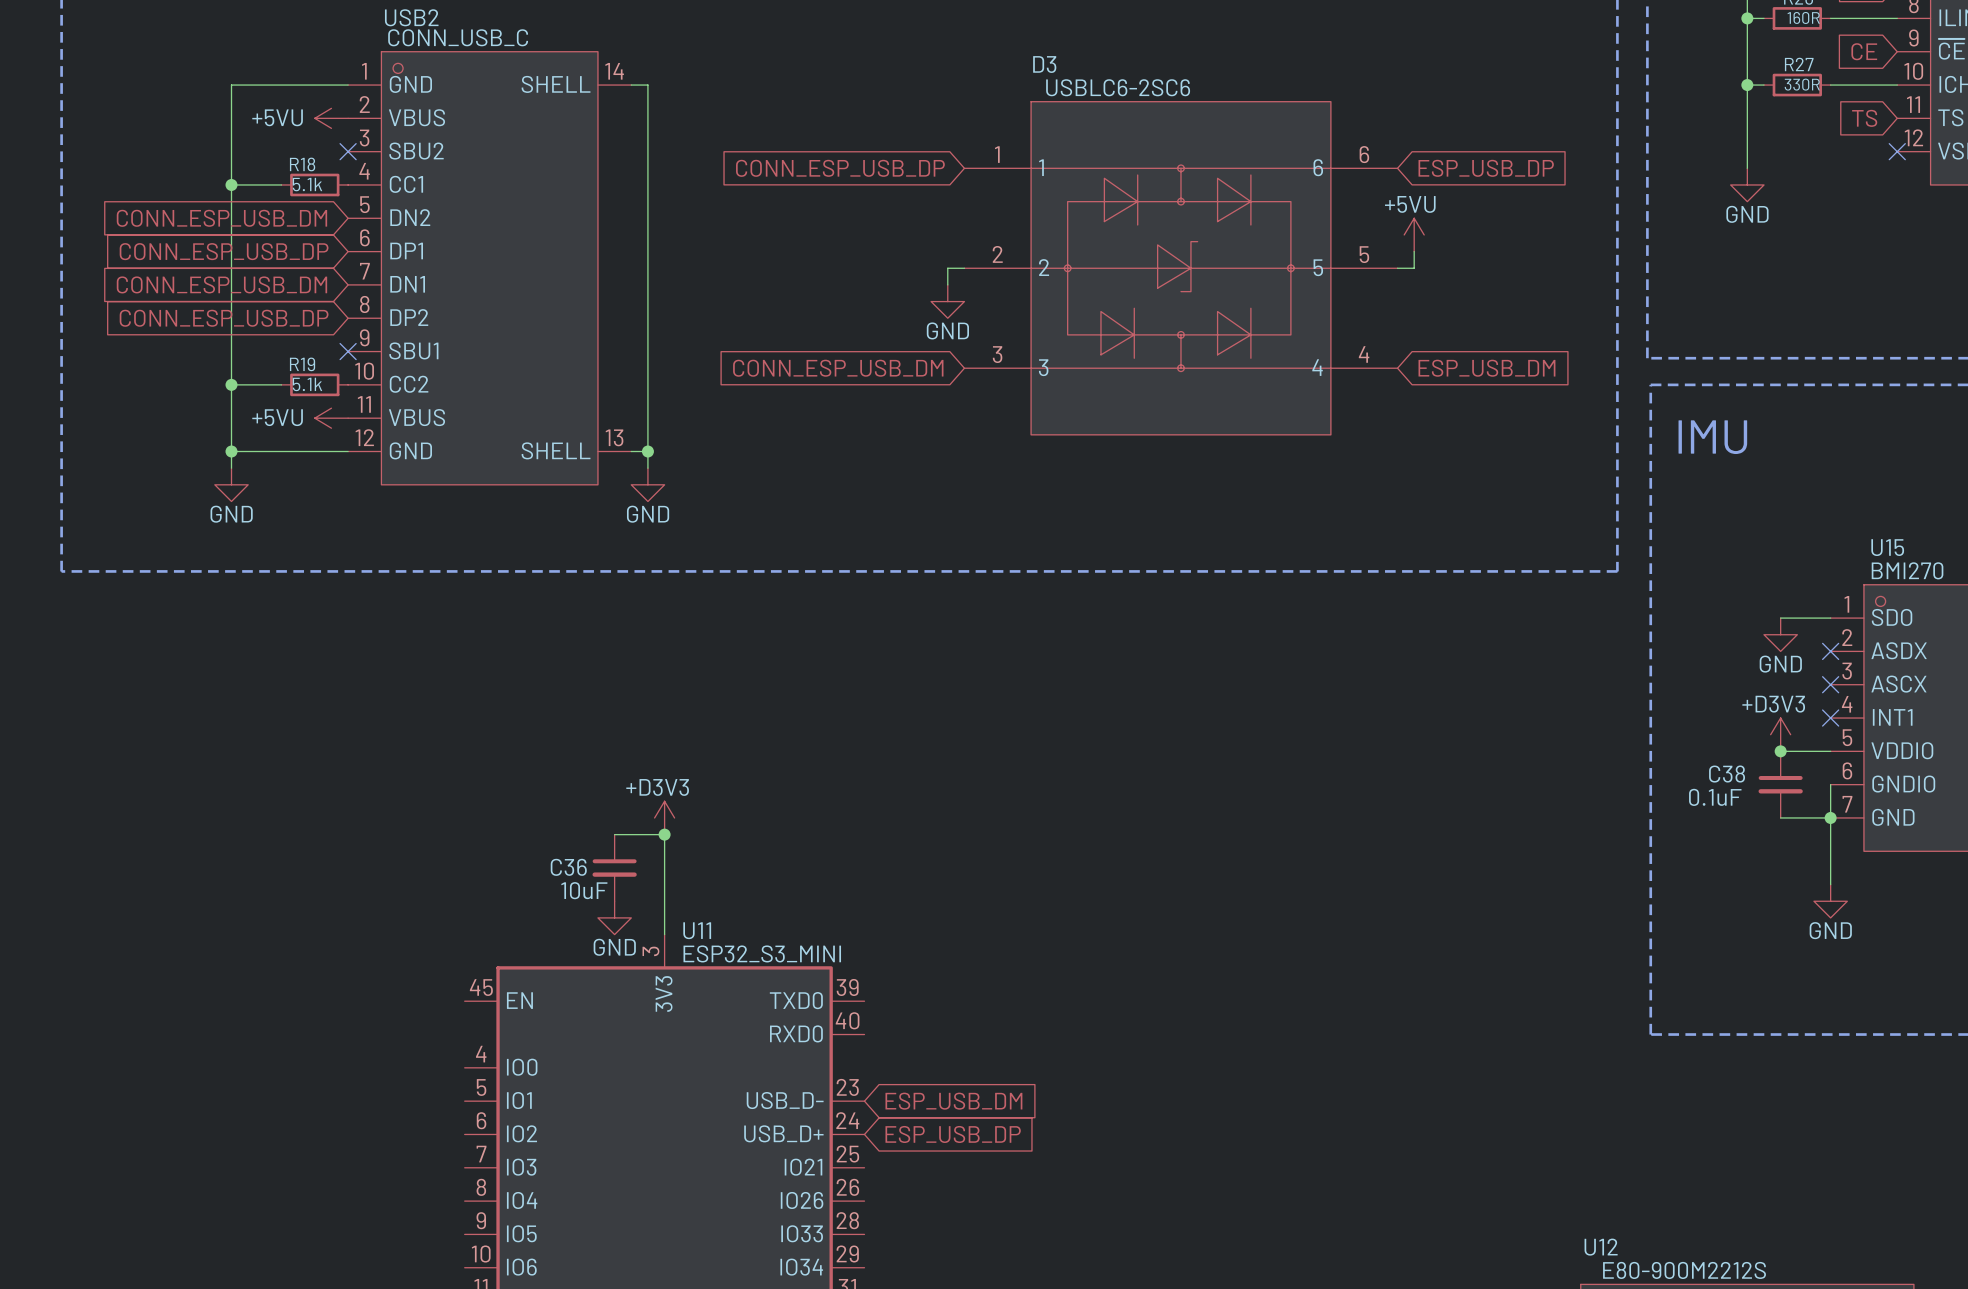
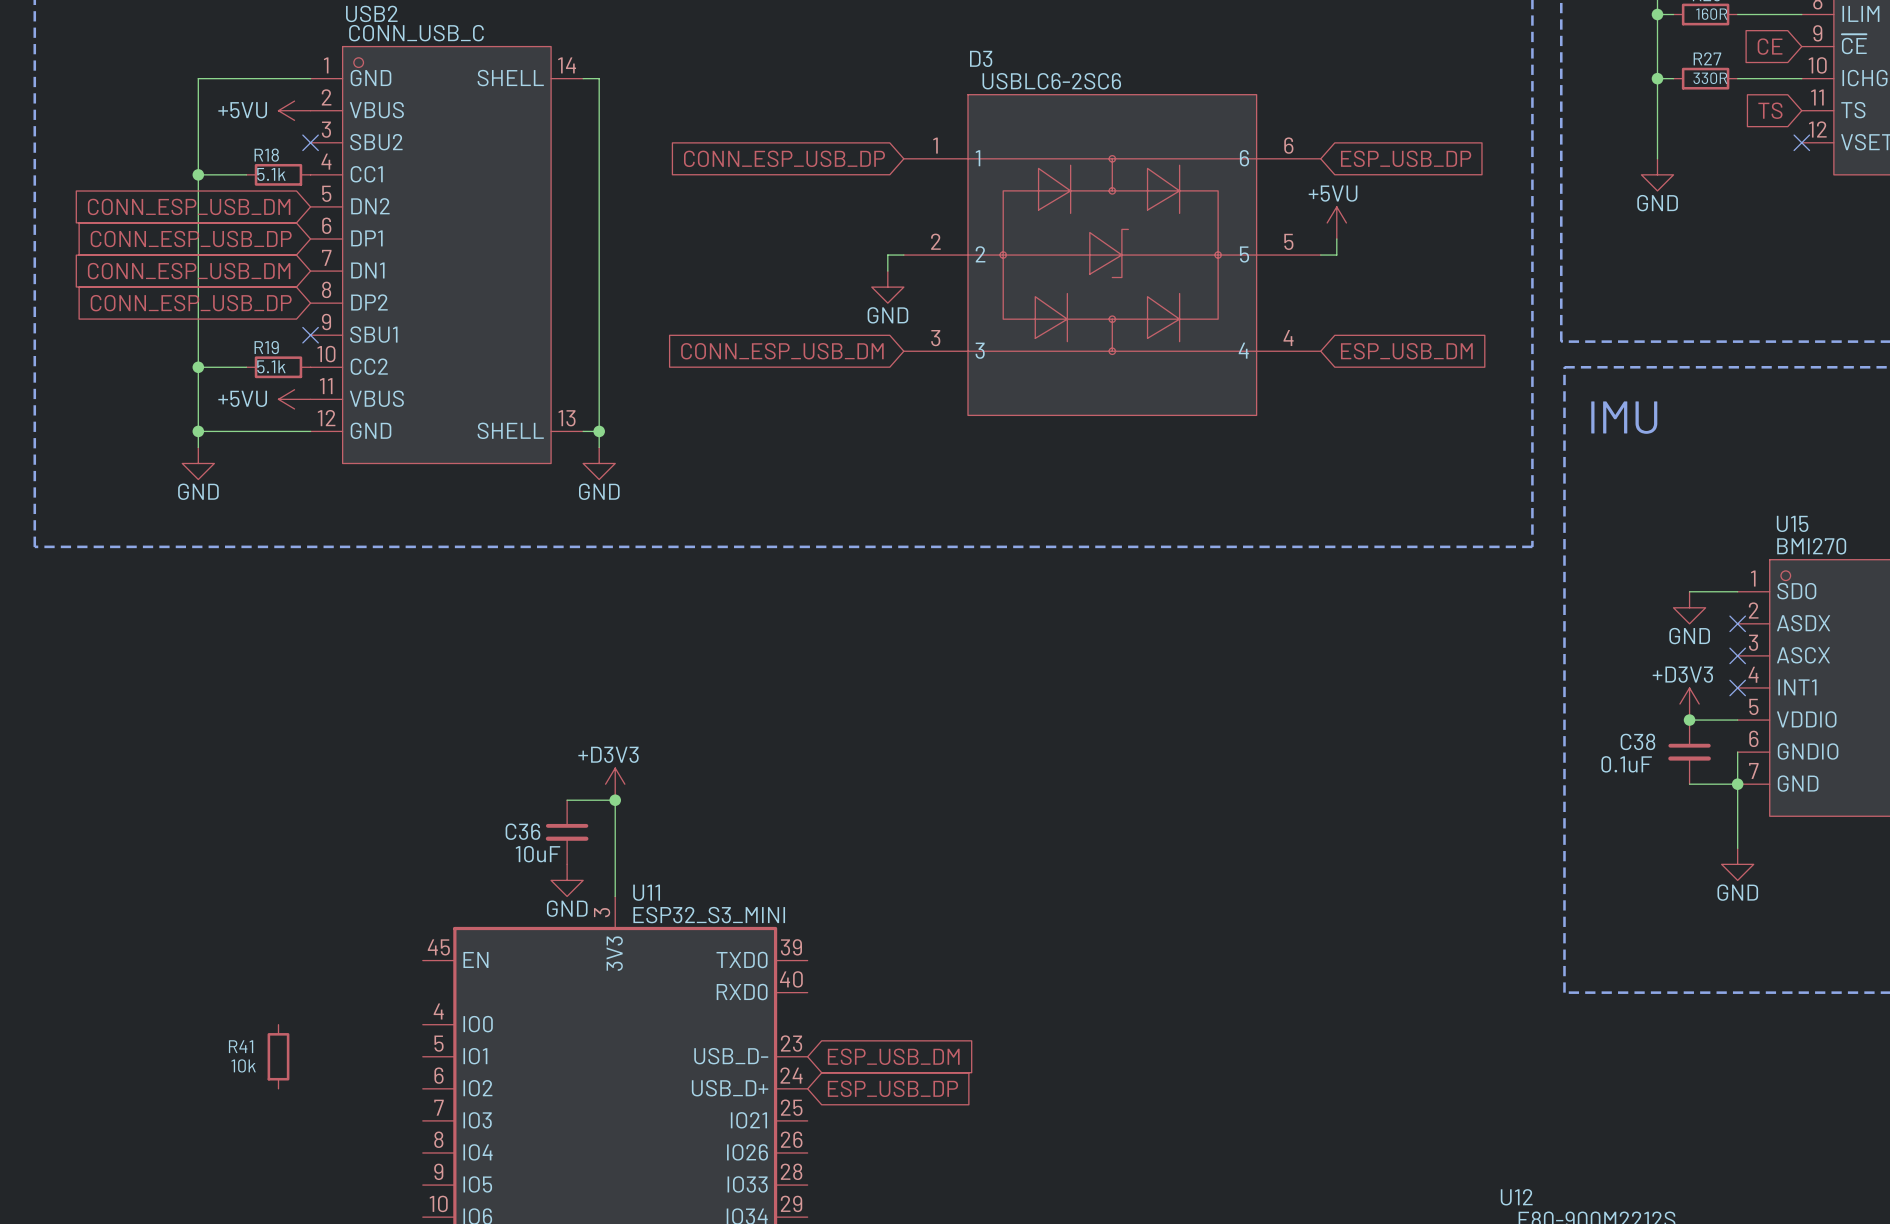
R41: none -> 10k (278, 1056)

